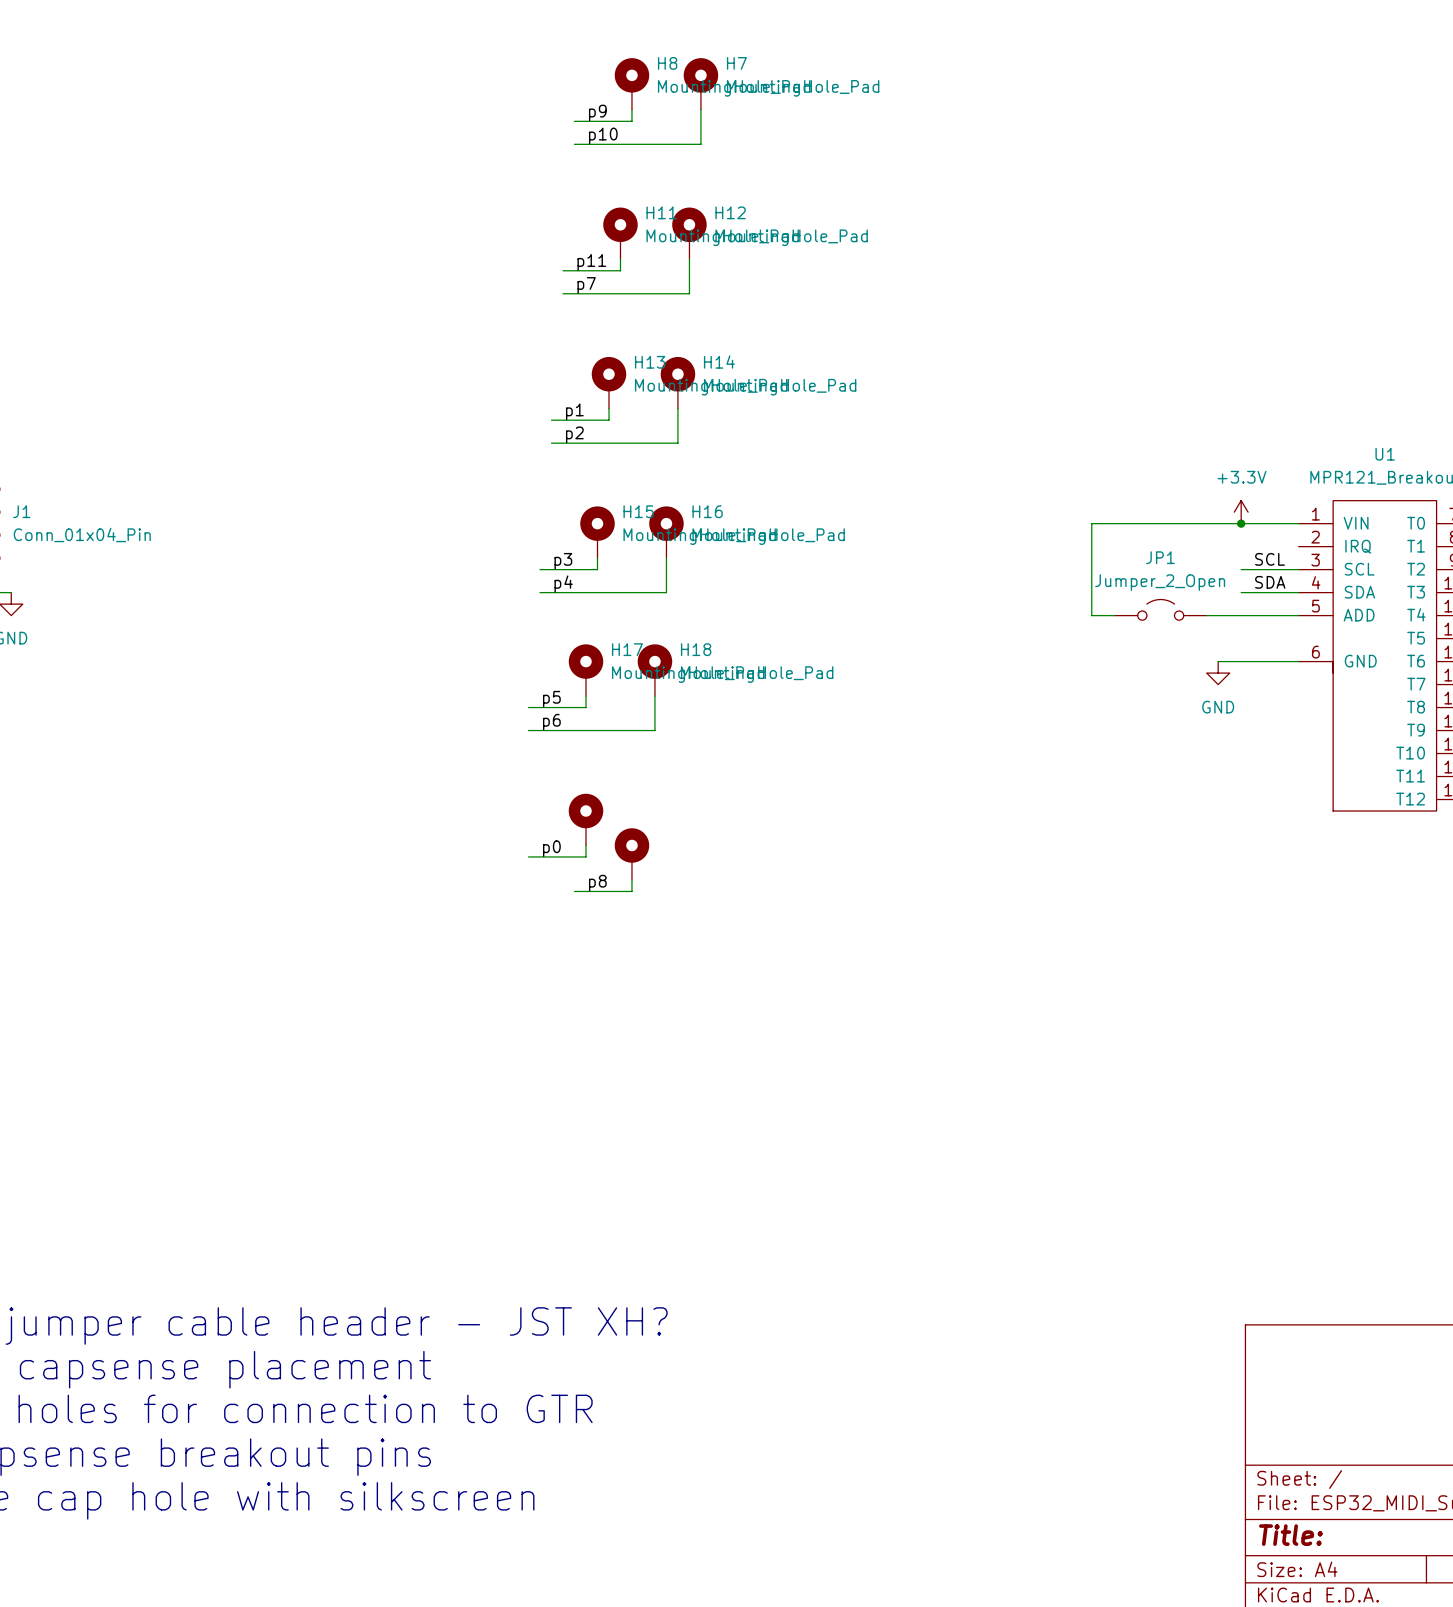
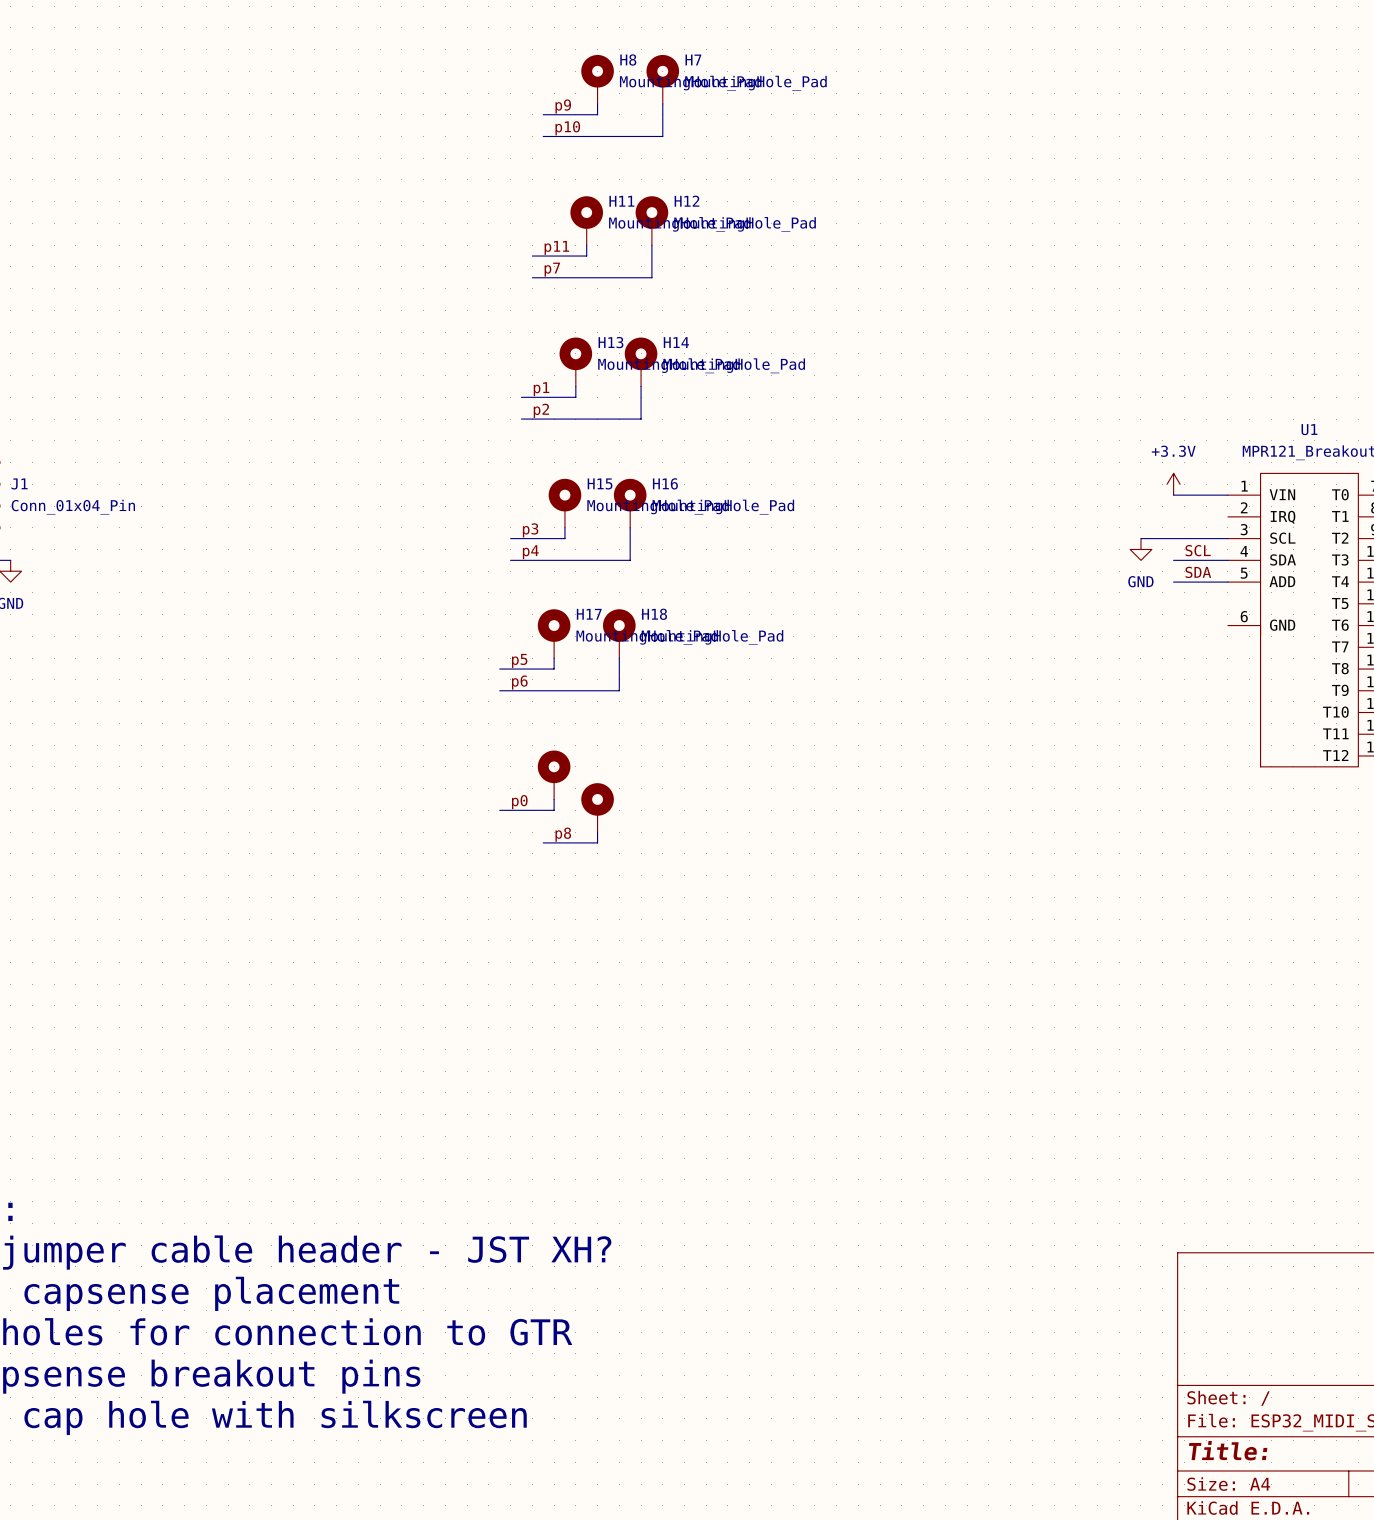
wire: (1241, 523) (1091, 523) (1091, 615) (1114, 615) -> none
junction: (1241, 523) -> none
label: SCL (1270, 559) -> none
label: SDA (1270, 582) -> SCL (1198, 550)
label: none -> SDA (1198, 572)
JP1: Jumper_2_Open (1160, 609) -> none
wire: (1206, 615) (1241, 615) -> (1140, 538) (1173, 538)
wire: (1218, 661) (1298, 661) -> none
power symbol position: GND (1218, 673) -> GND (1140, 549)

